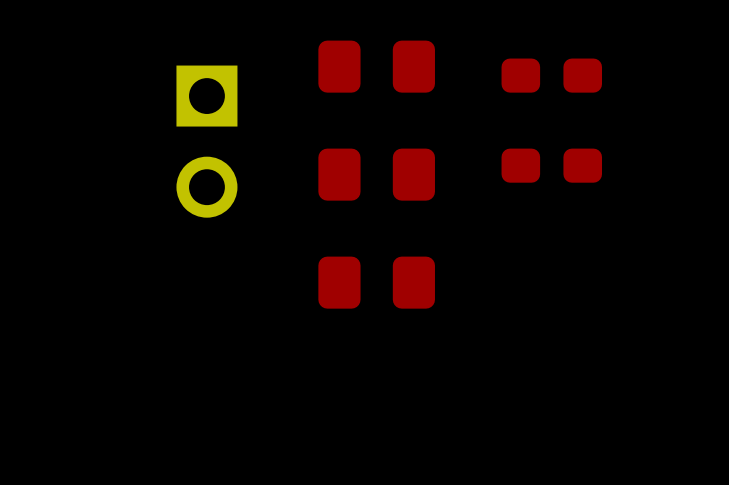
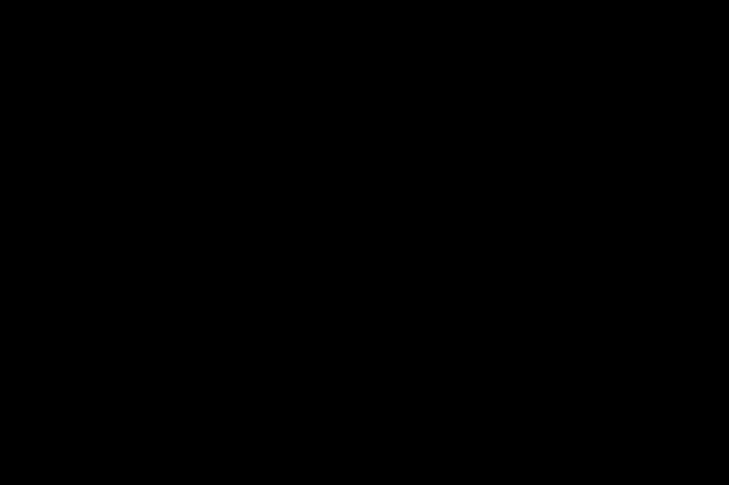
part: (376, 66) -> none
part: (551, 75) -> none
part: (206, 141) -> none
part: (551, 165) -> none
part: (376, 174) -> none
part: (376, 282) -> none

